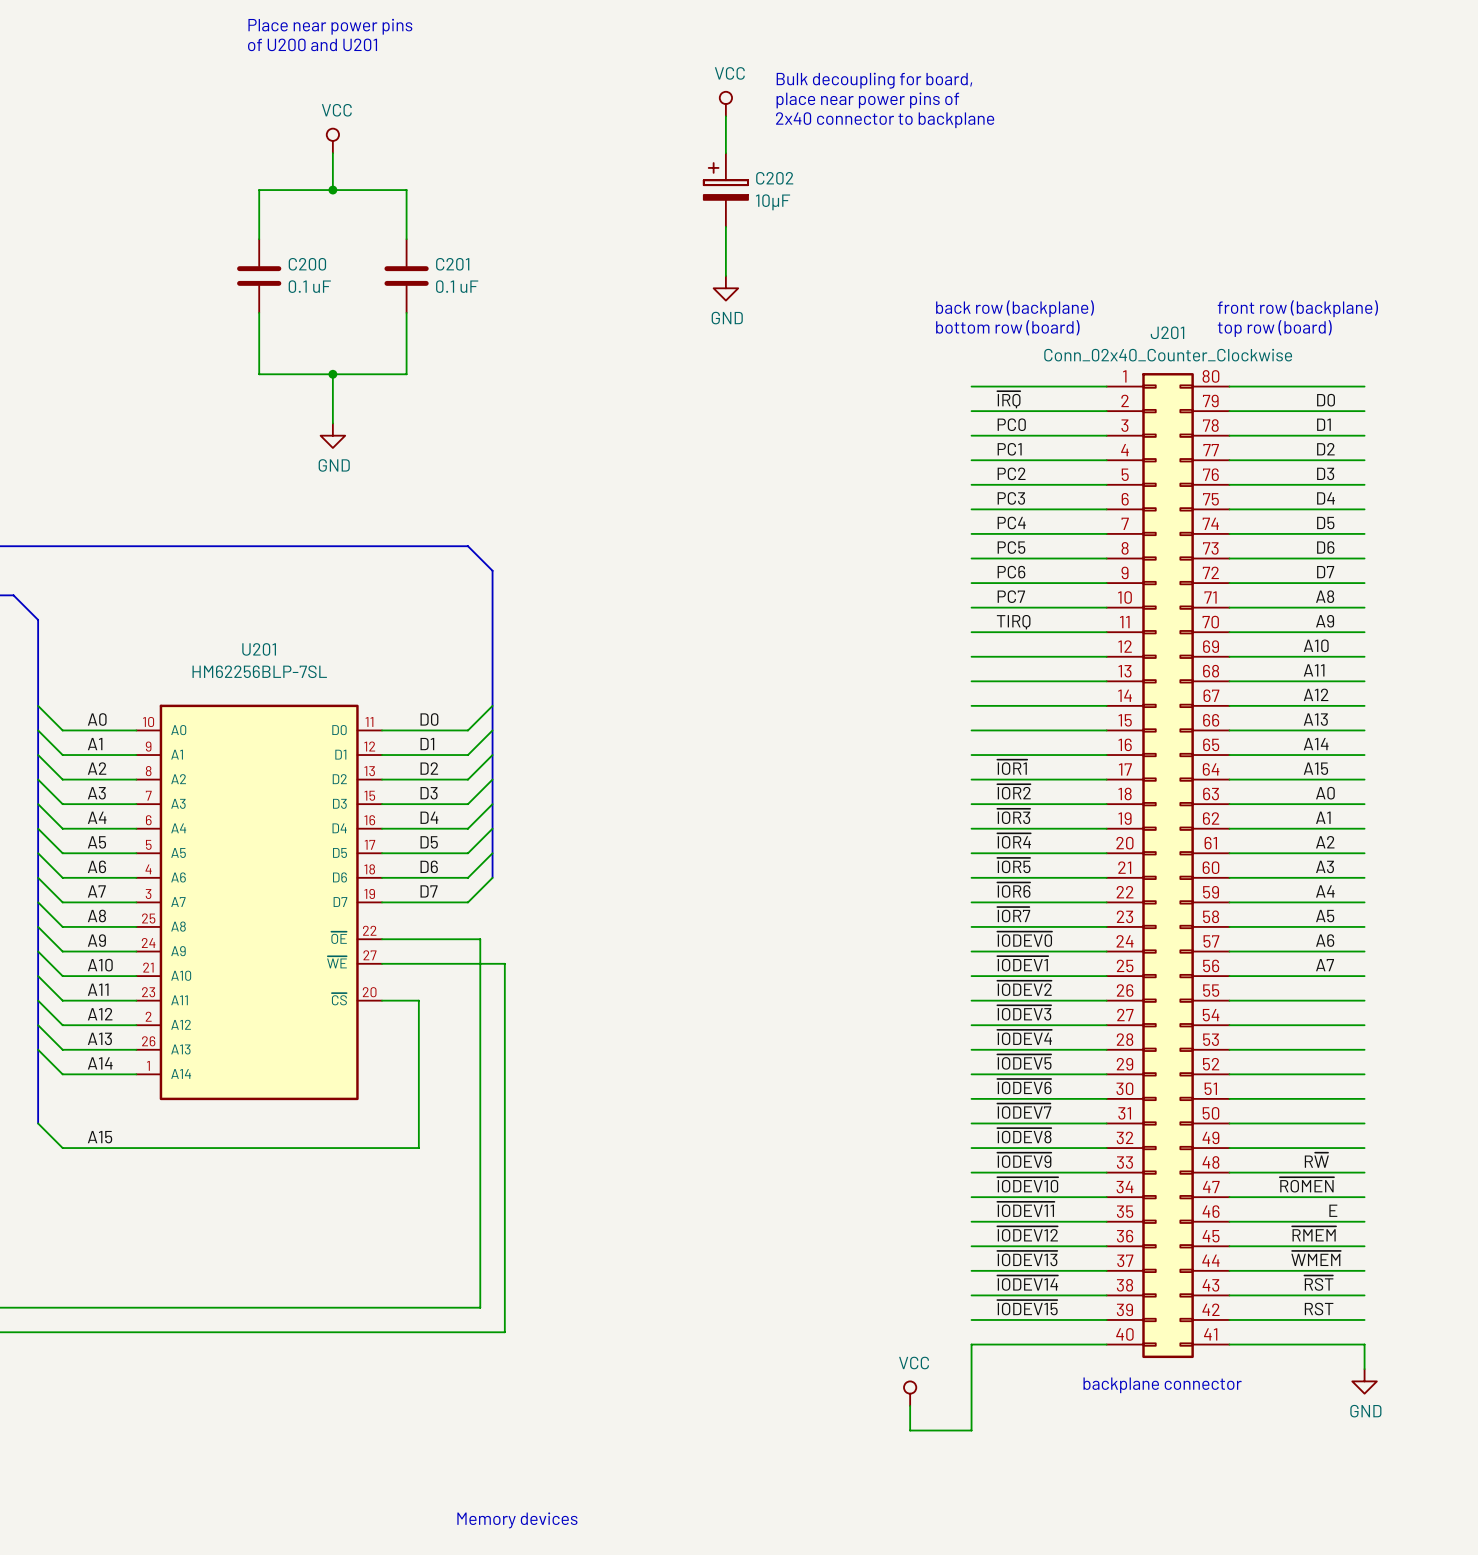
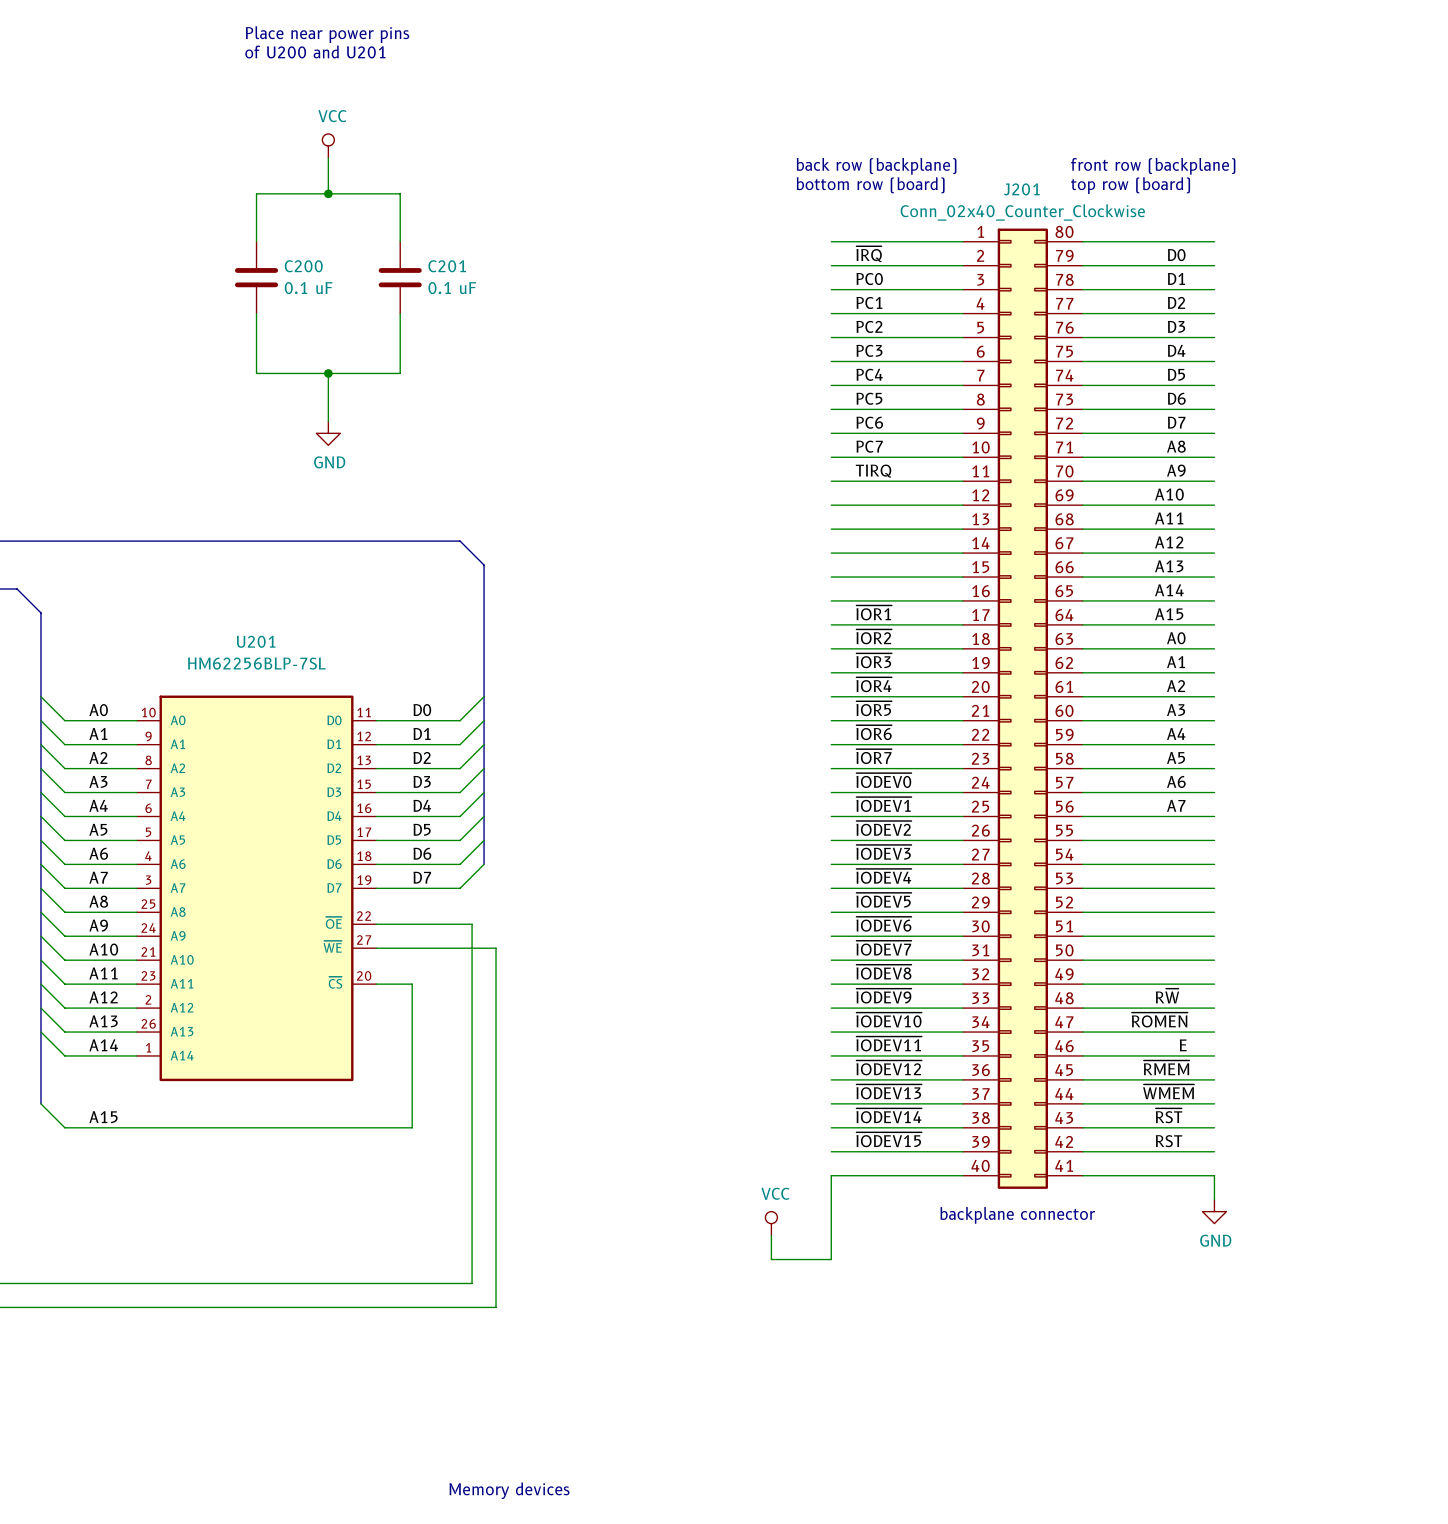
text: Bulk decoupling for board, (874, 80) -> none
text: place near power pins of (867, 100) -> none
power symbol: VCC (725, 104) -> none
wire: (725, 116) (725, 153) -> none
text: 2x40 connector to backplane (885, 120) -> none
C202: 10μF (725, 190) -> none
wire: (725, 226) (725, 276) -> none
wire: none -> (831, 241) (962, 241)
wire: none -> (1082, 241) (1214, 241)
wire: none -> (831, 265) (962, 265)
wire: none -> (1082, 265) (1214, 265)
power symbol: GND (725, 288) -> none
wire: none -> (831, 289) (962, 289)
wire: none -> (1082, 289) (1214, 289)
text position: back row (backplane) (1015, 308) -> back row (backplane) (876, 166)
text position: front row (backplane) (1297, 308) -> front row (backplane) (1153, 166)
wire: none -> (831, 313) (962, 313)
wire: none -> (1082, 313) (1214, 313)
text position: bottom row (board) (1007, 327) -> bottom row (board) (870, 185)
text position: top row (board) (1274, 328) -> top row (board) (1130, 185)
wire: none -> (831, 337) (962, 337)
wire: none -> (1082, 337) (1214, 337)
wire: none -> (831, 361) (962, 361)
wire: none -> (1082, 361) (1214, 361)
wire: none -> (831, 385) (951, 385)
wire: (1241, 386) (1364, 386) -> none
label position: ~{IRQ} (1008, 399) -> ~{IRQ} (869, 254)
label position: D0 (1326, 400) -> D0 (1176, 255)
wire: none -> (831, 409) (951, 409)
wire: (1241, 411) (1364, 411) -> none
label position: PC0 (1011, 424) -> PC0 (869, 279)
label position: D1 (1323, 424) -> D1 (1176, 278)
wire: none -> (831, 433) (951, 433)
wire: (1241, 435) (1364, 435) -> none
label position: PC1 (1009, 449) -> PC1 (869, 302)
label position: D2 (1325, 449) -> D2 (1176, 302)
wire: none -> (831, 457) (951, 457)
wire: (1241, 460) (1364, 460) -> none
label position: PC2 (1011, 473) -> PC2 (869, 326)
label position: D3 (1325, 473) -> D3 (1176, 326)
wire: none -> (831, 481) (951, 481)
wire: (1241, 484) (1364, 484) -> none
label position: PC3 (1011, 498) -> PC3 (869, 350)
label position: D4 (1325, 498) -> D4 (1176, 350)
wire: none -> (831, 505) (951, 505)
wire: (1241, 509) (1364, 509) -> none
label position: PC4 (1011, 522) -> PC4 (869, 374)
label position: D5 (1325, 523) -> D5 (1176, 374)
wire: none -> (831, 529) (951, 529)
wire: (1241, 533) (1364, 533) -> none
label position: PC5 (1011, 547) -> PC5 (869, 398)
label position: D6 (1325, 547) -> D6 (1176, 398)
wire: none -> (831, 553) (951, 553)
wire: (1241, 558) (1364, 558) -> none
label position: PC6 (1011, 572) -> PC6 (869, 422)
label position: D7 (1325, 572) -> D7 (1176, 422)
wire: none -> (831, 577) (951, 577)
wire: (1241, 583) (1364, 583) -> none
label position: PC7 (1011, 596) -> PC7 (869, 446)
label position: A8 (1325, 596) -> A8 (1176, 446)
wire: none -> (831, 600) (951, 600)
wire: (1241, 607) (1364, 607) -> none
label position: A9 (1325, 621) -> A9 (1176, 470)
label position: TIRQ (1013, 622) -> TIRQ (873, 471)
wire: none -> (831, 624) (951, 624)
wire: (1241, 632) (1364, 632) -> none
label position: A10 (1316, 645) -> A10 (1169, 494)
wire: none -> (831, 648) (951, 648)
wire: (1241, 656) (1364, 656) -> none
label position: A11 (1314, 670) -> A11 (1169, 518)
wire: none -> (831, 672) (951, 672)
wire: (1241, 681) (1364, 681) -> none
label position: A12 (1316, 694) -> A12 (1169, 542)
wire: none -> (831, 696) (951, 696)
wire: (1241, 705) (1364, 705) -> none
label position: A13 (1315, 719) -> A13 (1169, 566)
wire: none -> (831, 720) (951, 720)
wire: (1241, 730) (1364, 730) -> none
label position: A14 (1316, 744) -> A14 (1169, 590)
wire: none -> (831, 744) (951, 744)
wire: (1241, 755) (1364, 755) -> none
label position: ~{IOR1} (1012, 767) -> ~{IOR1} (874, 612)
label position: A15 (1315, 768) -> A15 (1169, 614)
wire: none -> (831, 768) (951, 768)
wire: (1241, 779) (1364, 779) -> none
label position: ~{IOR2} (1014, 791) -> ~{IOR2} (874, 636)
label position: A0 (1325, 793) -> A0 (1176, 638)
wire: none -> (831, 792) (951, 792)
wire: (1241, 804) (1364, 804) -> none
label position: ~{IOR3} (1013, 816) -> ~{IOR3} (874, 660)
label position: A1 (1323, 817) -> A1 (1176, 662)
wire: none -> (831, 816) (951, 816)
wire: (1241, 828) (1364, 828) -> none
label position: ~{IOR4} (1014, 840) -> ~{IOR4} (874, 684)
label position: A2 (1325, 842) -> A2 (1176, 686)
wire: none -> (831, 840) (951, 840)
wire: (1241, 853) (1364, 853) -> none
label position: ~{IOR5} (1013, 865) -> ~{IOR5} (874, 708)
J201 position: (1168, 865) -> (1022, 708)
label position: A3 (1325, 866) -> A3 (1176, 710)
wire: none -> (831, 864) (951, 864)
wire: (1241, 877) (1364, 877) -> none
label position: ~{IOR6} (1013, 890) -> ~{IOR6} (874, 732)
label position: A4 (1325, 891) -> A4 (1176, 733)
wire: none -> (831, 888) (951, 888)
wire: (1241, 902) (1364, 902) -> none
label position: ~{IOR7} (1013, 914) -> ~{IOR7} (874, 756)
label position: A5 (1325, 916) -> A5 (1176, 757)
wire: none -> (831, 912) (951, 912)
wire: (1241, 926) (1364, 926) -> none
label position: ~{IODEV0} (1024, 939) -> ~{IODEV0} (883, 780)
label position: A6 (1325, 940) -> A6 (1176, 781)
wire: none -> (831, 936) (951, 936)
wire: (1241, 951) (1364, 951) -> none
label position: ~{IODEV1} (1022, 963) -> ~{IODEV1} (883, 804)
label position: A7 (1325, 965) -> A7 (1176, 805)
wire: none -> (831, 960) (951, 960)
wire: (1241, 976) (1364, 976) -> none
label position: ~{IODEV2} (1024, 988) -> ~{IODEV2} (883, 828)
wire: none -> (831, 984) (951, 984)
wire: (1241, 1000) (1364, 1000) -> none
label position: ~{IODEV3} (1024, 1012) -> ~{IODEV3} (883, 852)
wire: none -> (831, 1008) (951, 1008)
wire: (1241, 1025) (1364, 1025) -> none
label position: ~{IODEV4} (1024, 1037) -> ~{IODEV4} (883, 876)
wire: none -> (831, 1032) (951, 1032)
wire: (1241, 1049) (1364, 1049) -> none
label position: ~{IODEV5} (1024, 1062) -> ~{IODEV5} (883, 900)
wire: none -> (831, 1055) (951, 1055)
wire: (1241, 1074) (1364, 1074) -> none
label position: ~{IODEV6} (1024, 1086) -> ~{IODEV6} (883, 924)
wire: none -> (831, 1079) (951, 1079)
wire: (1241, 1098) (1364, 1098) -> none
label position: ~{IODEV7} (1024, 1111) -> ~{IODEV7} (883, 948)
wire: none -> (831, 1103) (951, 1103)
wire: (1241, 1123) (1364, 1123) -> none
label position: ~{IODEV8} (1024, 1135) -> ~{IODEV8} (883, 972)
wire: none -> (831, 1127) (951, 1127)
wire: (1241, 1148) (1364, 1148) -> none
label position: ~{IODEV9} (1024, 1160) -> ~{IODEV9} (883, 996)
label position: R~{W} (1316, 1160) -> R~{W} (1167, 996)
wire: none -> (831, 1151) (951, 1151)
wire: (1241, 1172) (1364, 1172) -> none
label position: ~{IODEV10} (1027, 1184) -> ~{IODEV10} (889, 1020)
label position: ~{ROMEN} (1306, 1184) -> ~{ROMEN} (1159, 1020)
wire: none -> (951, 1175) (831, 1175) (831, 1259) (771, 1259) (771, 1235)
wire: (1241, 1197) (1364, 1197) -> (1214, 1175) (1214, 1199)
label position: ~{IODEV11} (1025, 1209) -> ~{IODEV11} (889, 1043)
label position: E (1333, 1210) -> E (1183, 1045)
wire: (971, 1221) (1106, 1221) -> none
wire: (1229, 1221) (1364, 1221) -> none
label position: ~{IODEV12} (1027, 1233) -> ~{IODEV12} (889, 1067)
label position: ~{RMEM} (1314, 1233) -> ~{RMEM} (1166, 1067)
wire: (971, 1246) (1106, 1246) -> none
wire: (1229, 1246) (1364, 1246) -> none
label position: ~{IODEV13} (1027, 1258) -> ~{IODEV13} (889, 1091)
label position: ~{WMEM} (1316, 1258) -> ~{WMEM} (1168, 1091)
wire: (971, 1270) (1106, 1270) -> none
wire: (1229, 1270) (1364, 1270) -> none
label position: ~{IODEV14} (1027, 1283) -> ~{IODEV14} (889, 1115)
label position: ~{RST} (1318, 1283) -> ~{RST} (1169, 1115)
wire: (971, 1295) (1106, 1295) -> none
wire: (1229, 1295) (1364, 1295) -> none
label position: ~{IODEV15} (1027, 1307) -> ~{IODEV15} (889, 1139)
label position: RST (1319, 1309) -> RST (1169, 1141)
wire: (971, 1319) (1106, 1319) -> none
wire: (1229, 1319) (1364, 1319) -> none
wire: (1106, 1344) (971, 1344) (971, 1430) (910, 1430) (910, 1405) -> none
wire: (1229, 1344) (1364, 1344) (1364, 1369) -> none
power symbol position: GND (1364, 1381) -> GND (1214, 1211)
text position: backplane connector (1162, 1385) -> backplane connector (1017, 1215)
power symbol position: VCC (910, 1393) -> VCC (771, 1223)

